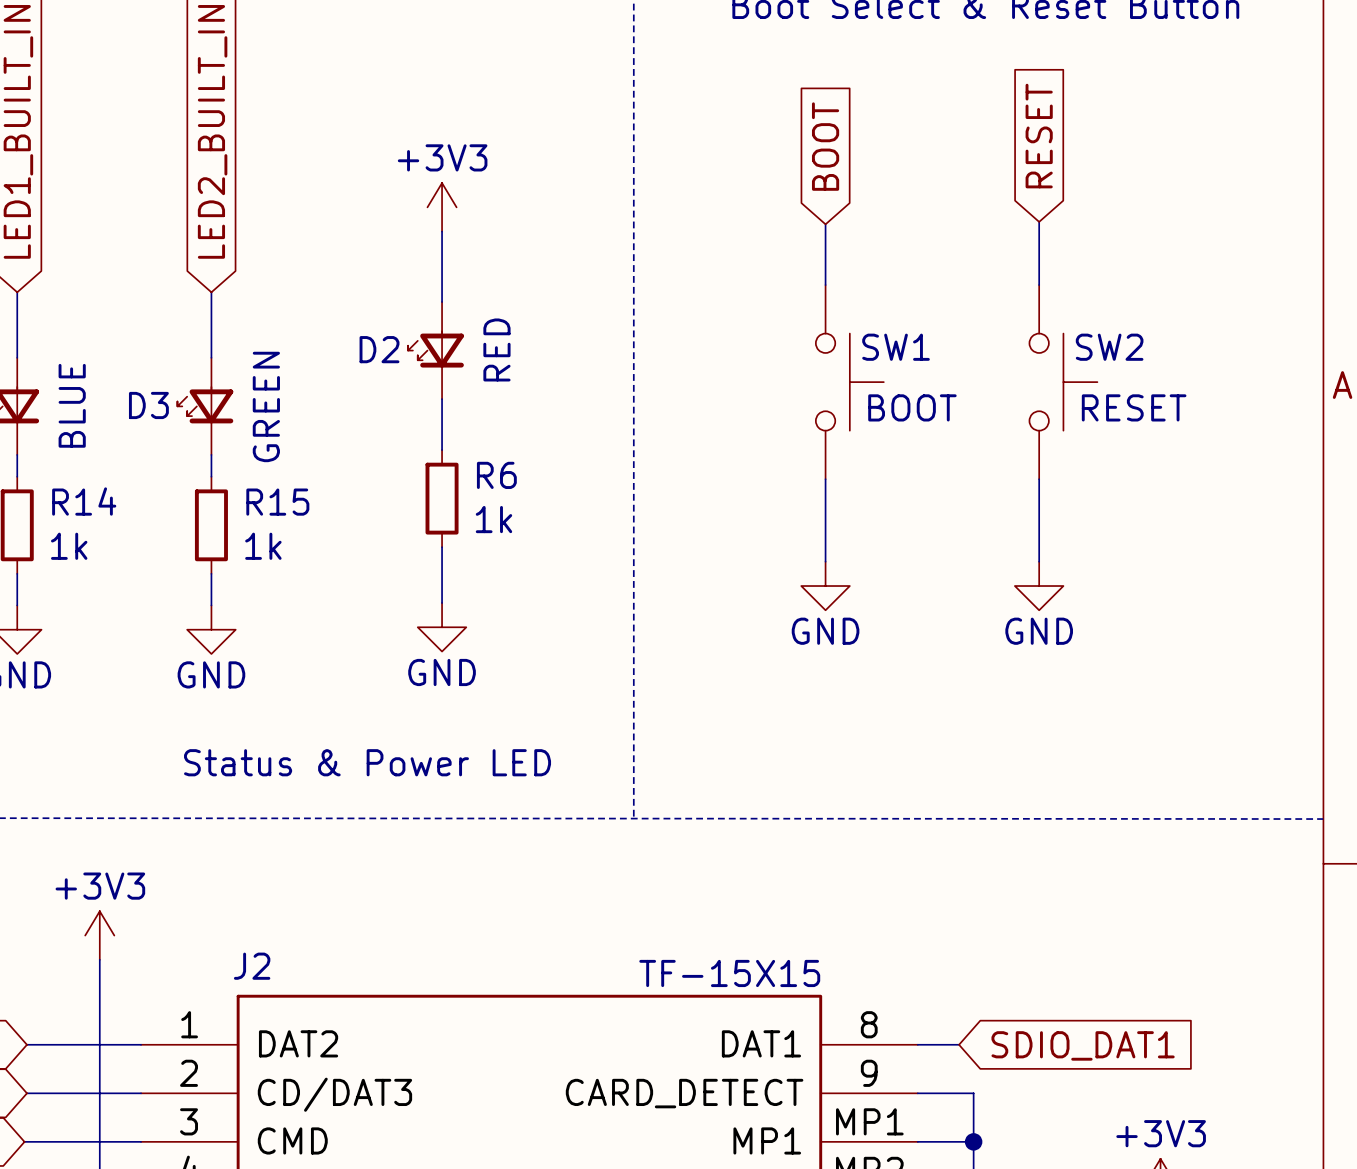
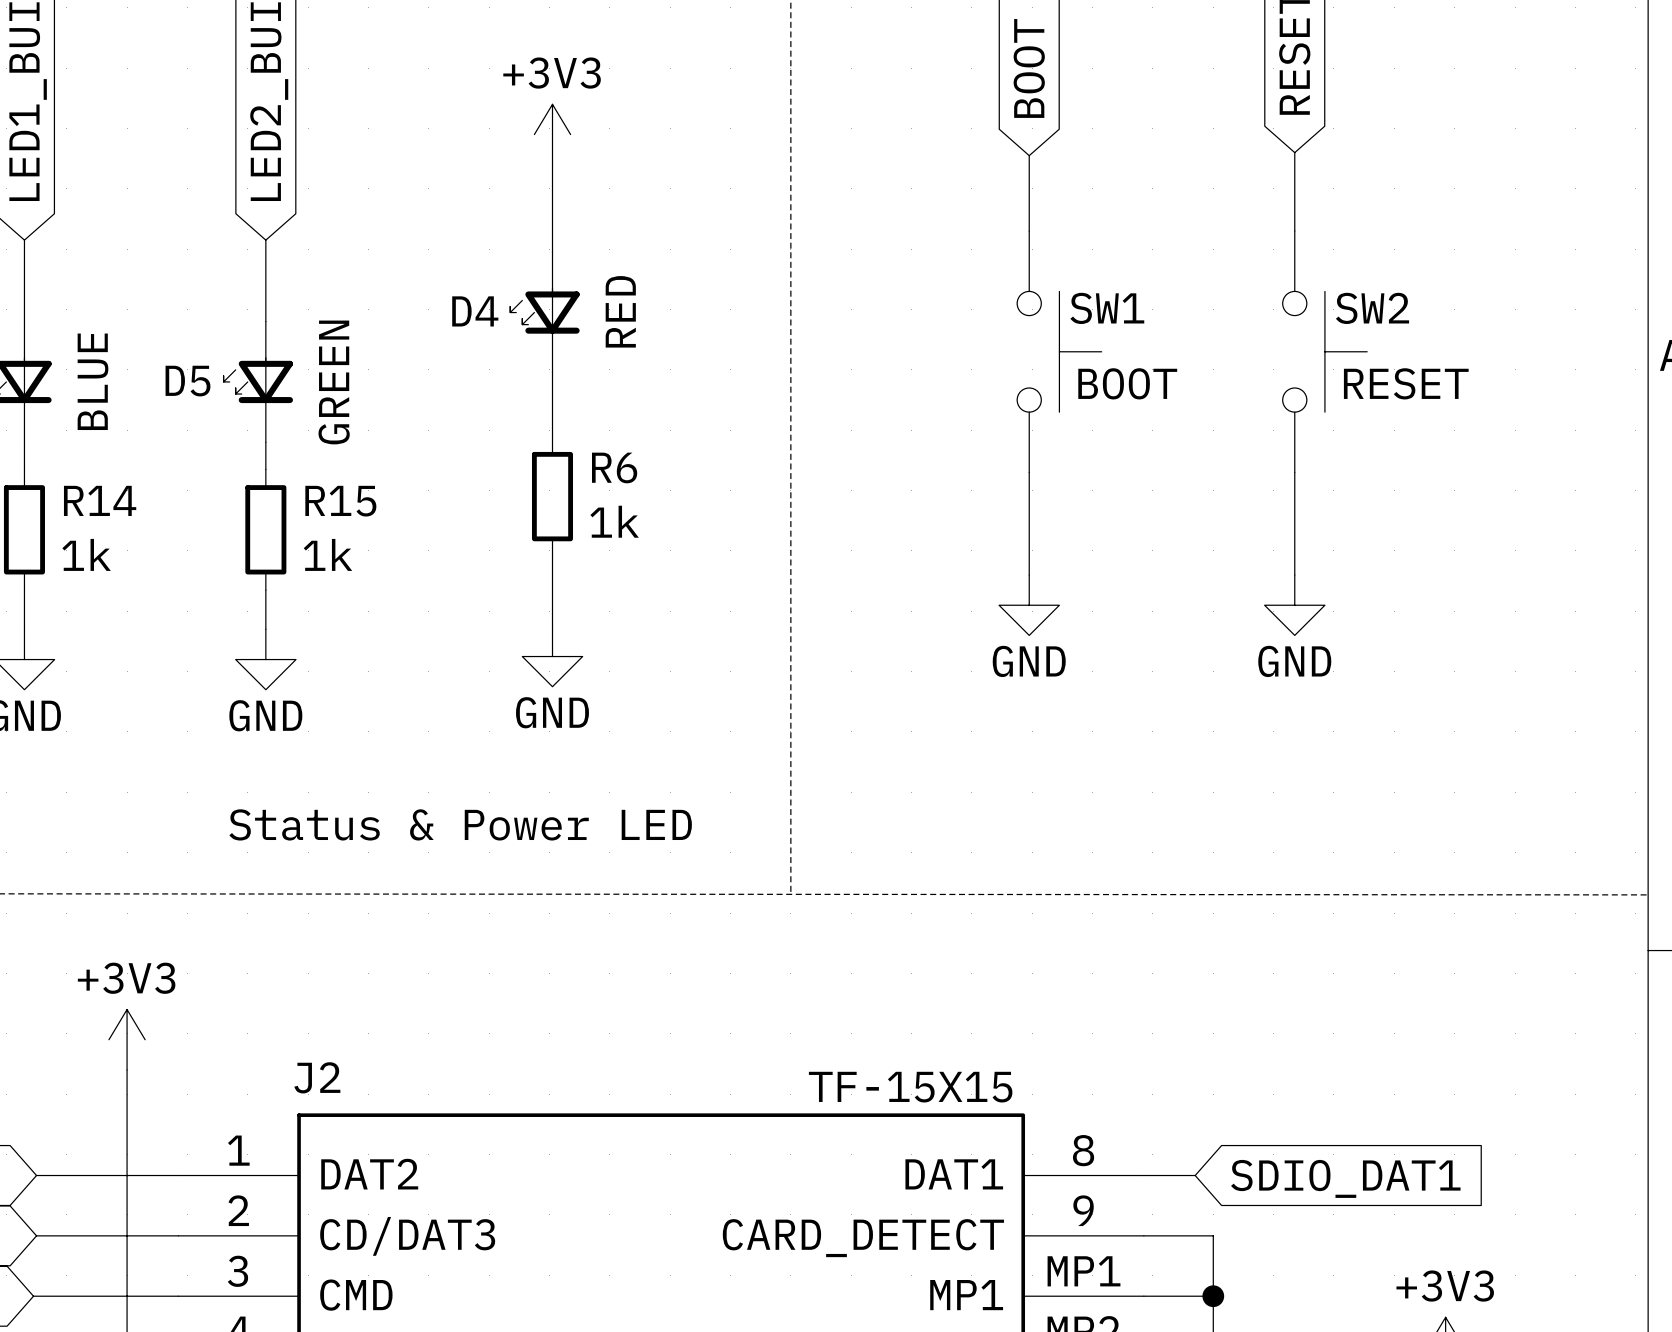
D2 name: D2 (379, 349) -> D4 (475, 311)
D3 name: D3 (148, 405) -> D5 (188, 381)

